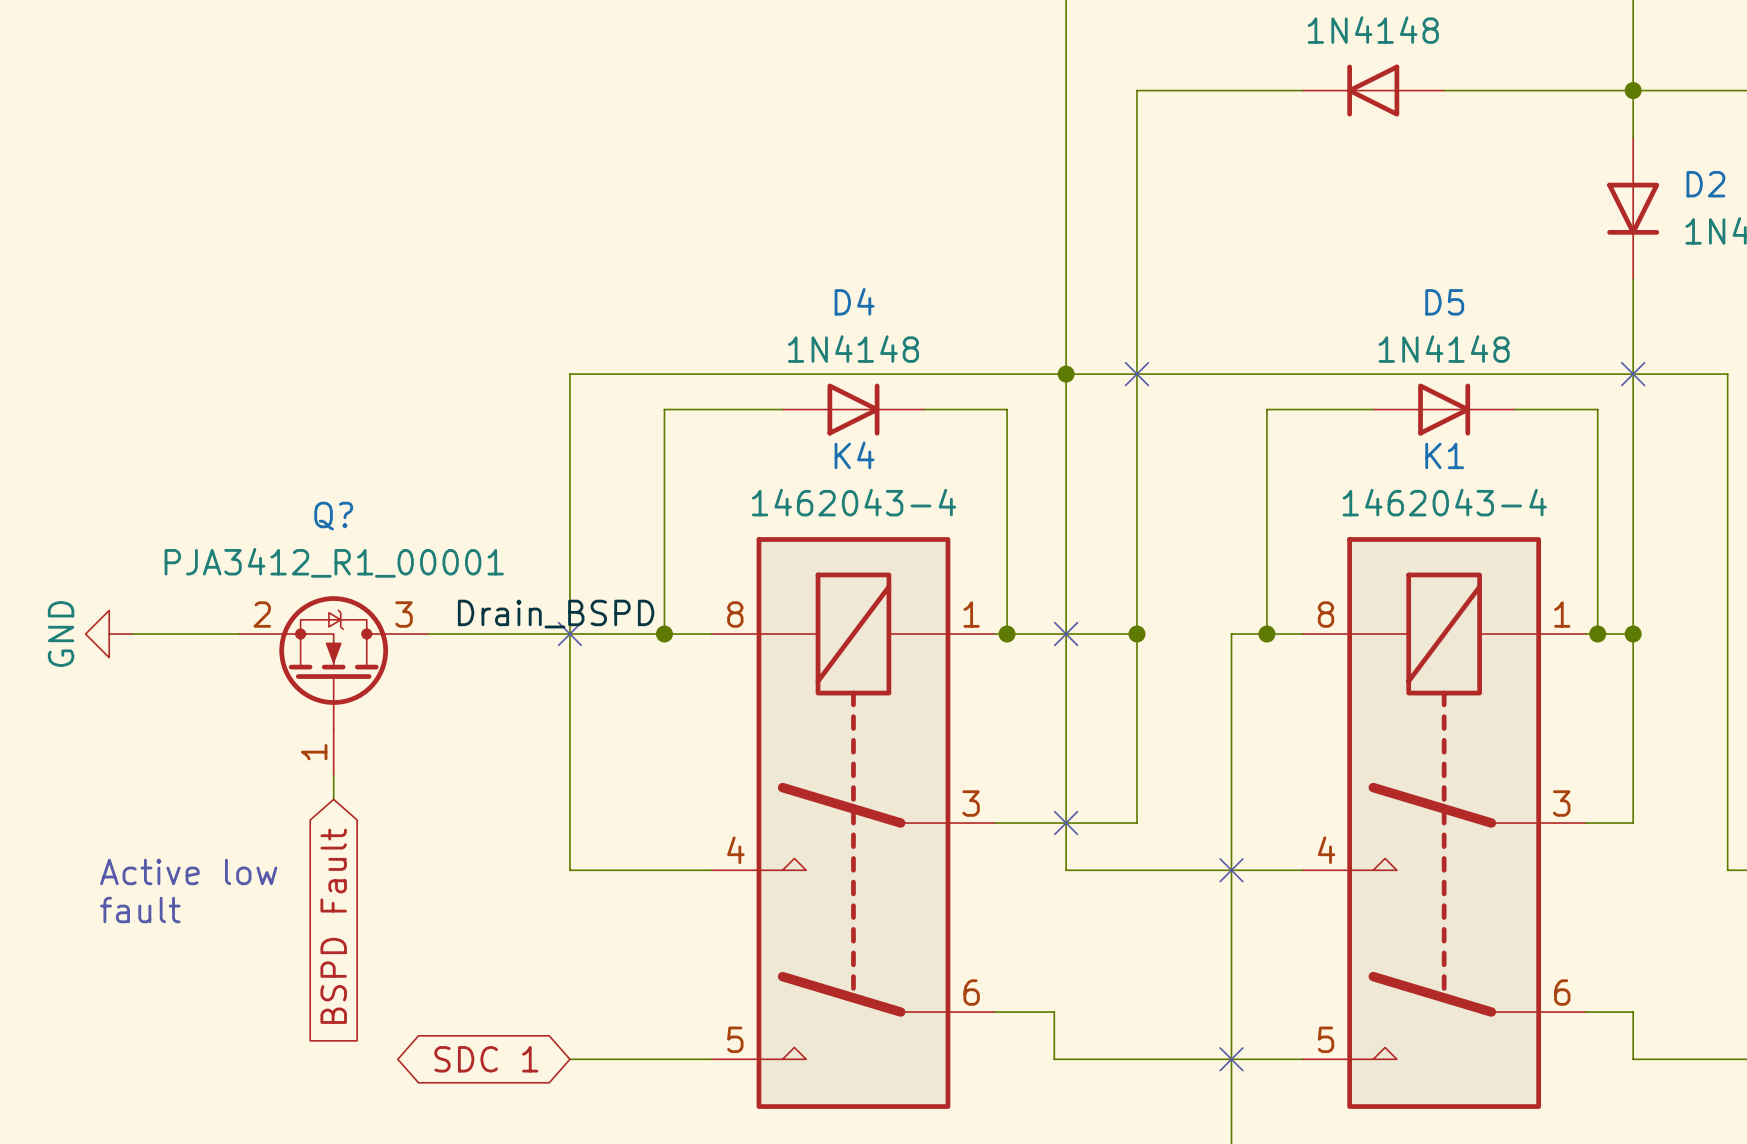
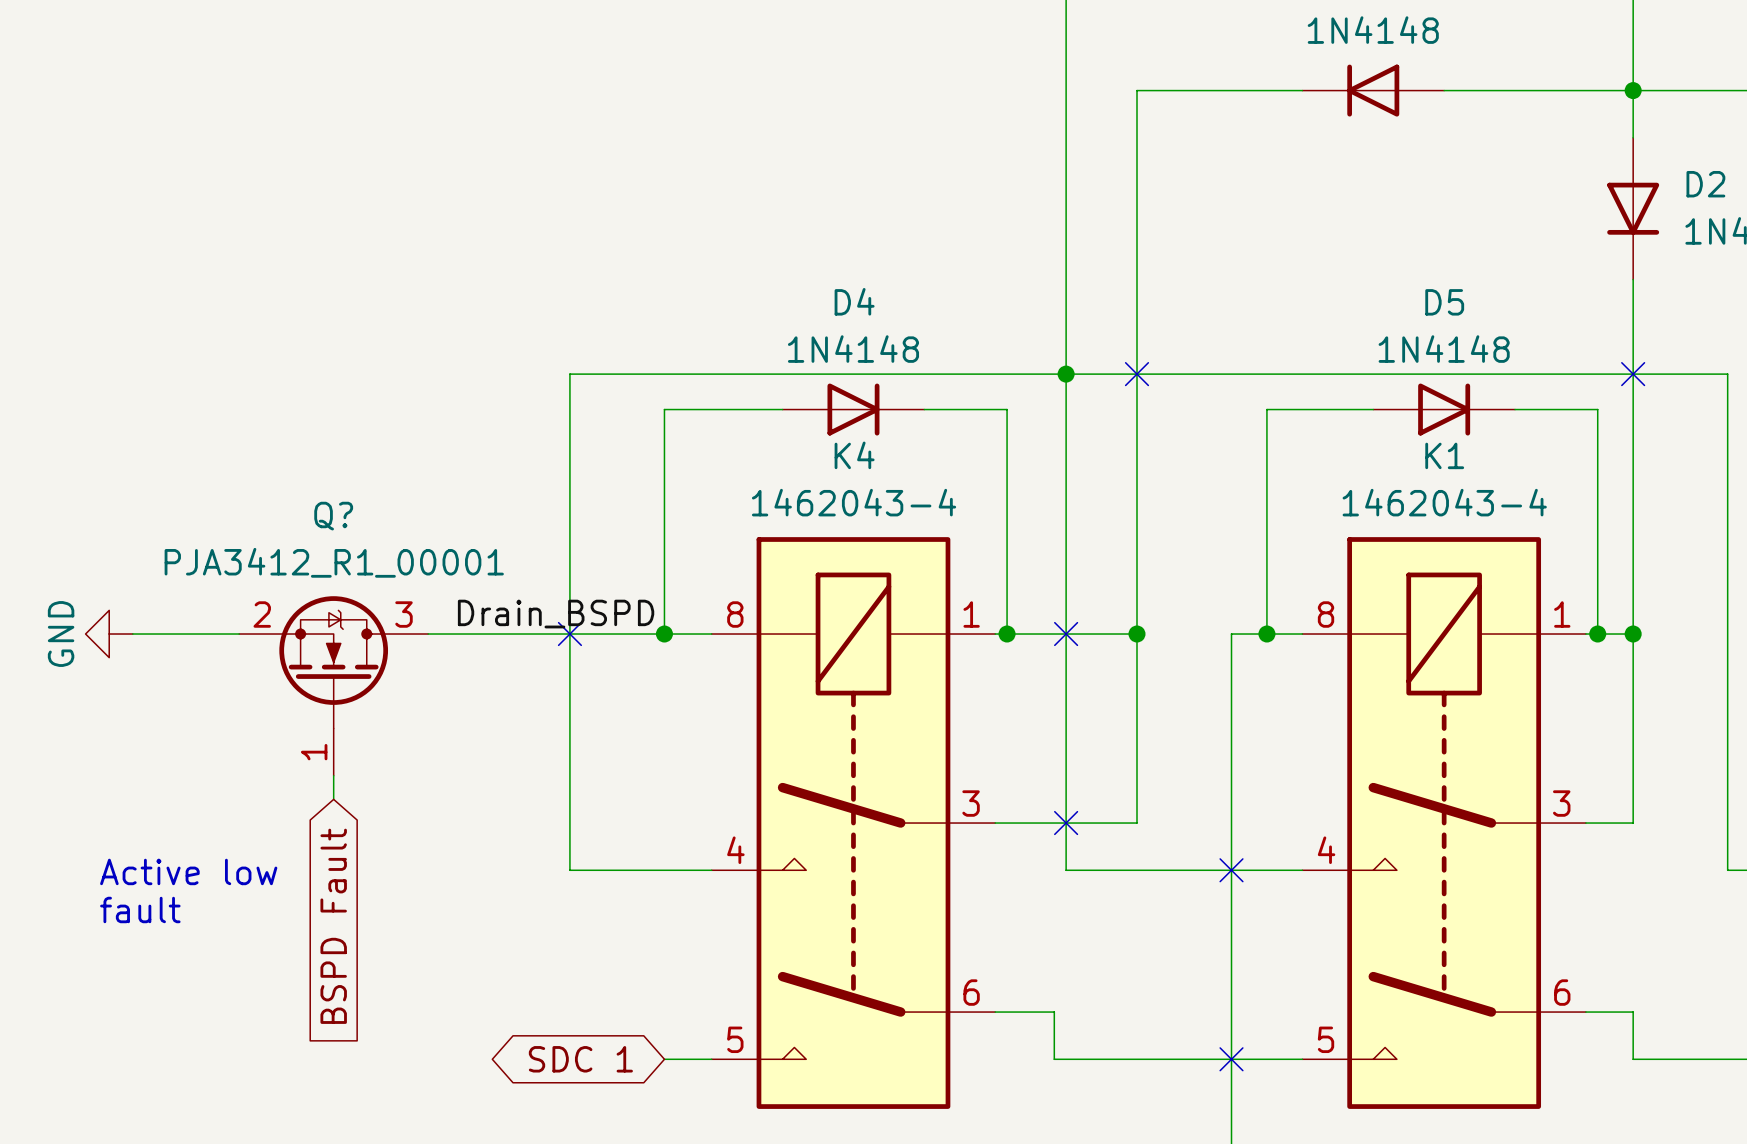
global label position: SDC 1 (486, 1059) -> SDC 1 (580, 1059)
wire: (569, 1059) (664, 1059) -> none

